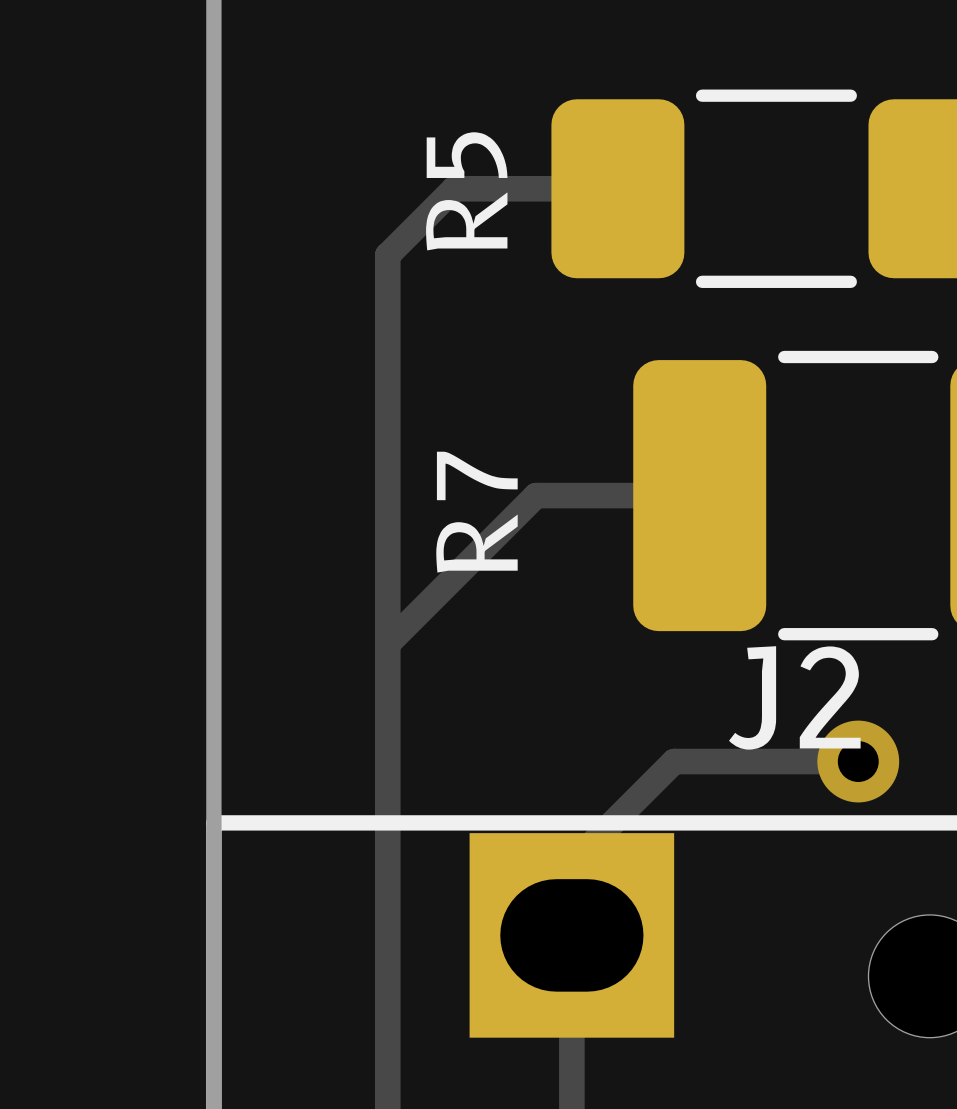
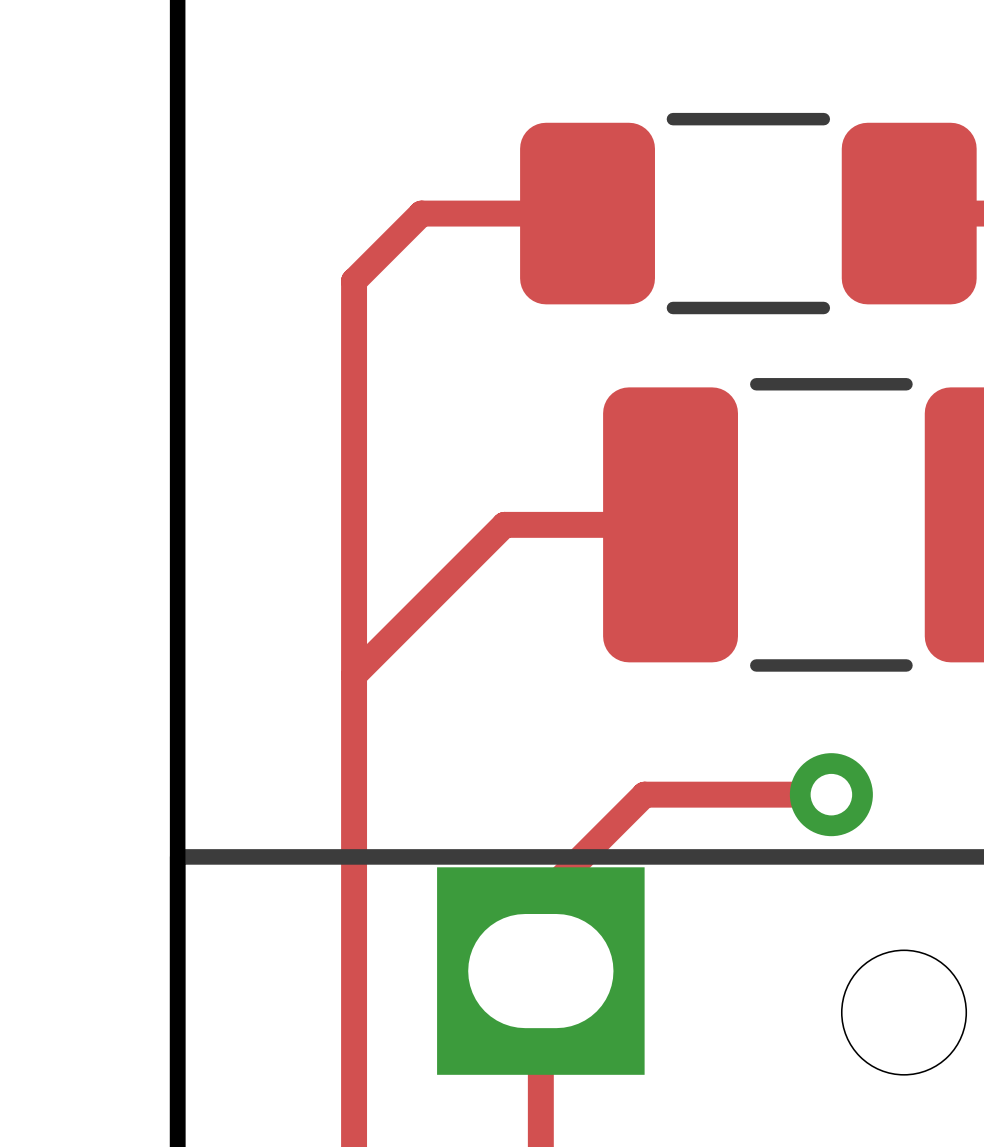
R5 name: R5 (466, 191) -> none
R7 name: R7 (476, 512) -> none
J2 name: J2 (794, 697) -> none

